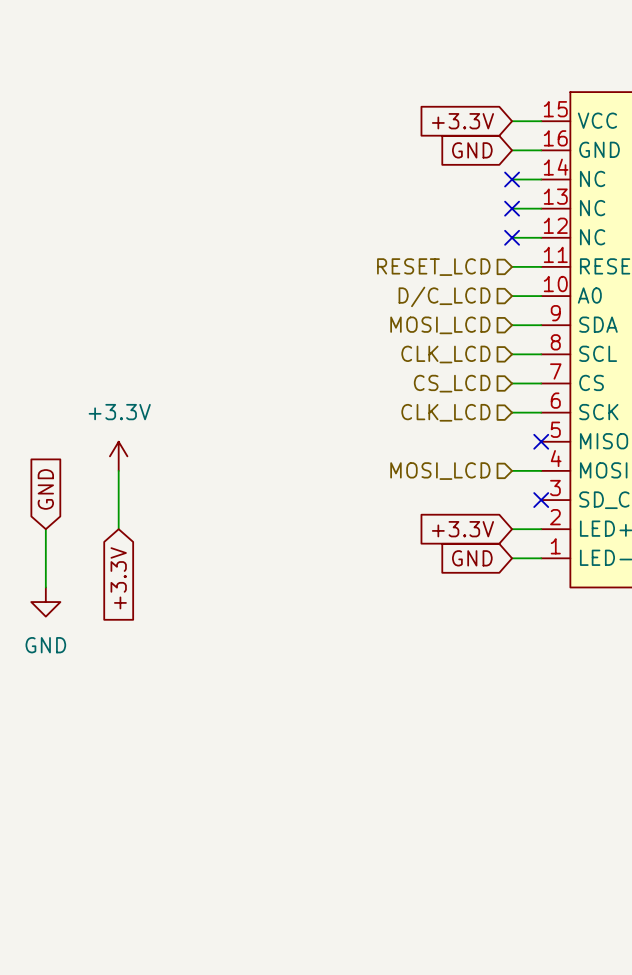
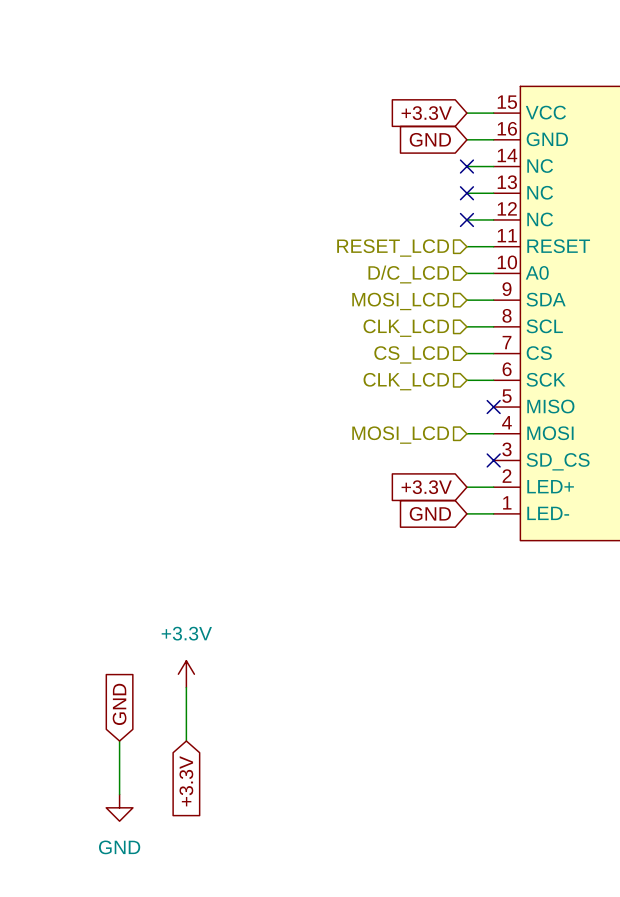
power symbol: +3.3V (118, 456) -> none
wire: (118, 470) (118, 529) -> none
global label: GND (45, 489) -> none
wire: (45, 529) (45, 587) -> (186, 687) (186, 741)
global label: +3.3V (118, 578) -> none
power symbol: GND (45, 602) -> none
power symbol: none -> +3.3V (186, 674)
global label: none -> GND (119, 704)
wire: none -> (119, 741) (119, 794)
global label: none -> +3.3V (186, 781)
power symbol: none -> GND (119, 807)

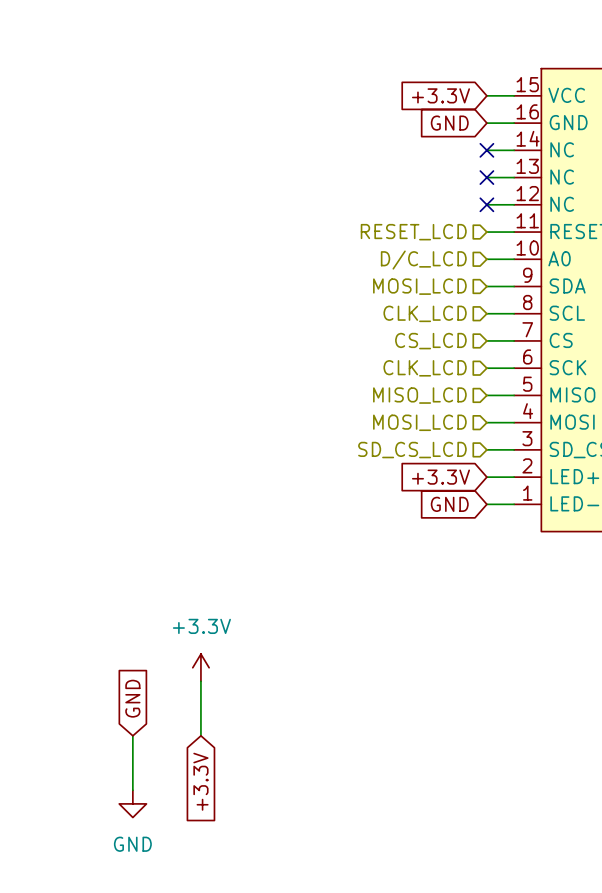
wire: none -> (486, 395) (514, 395)
no-connect mark: (493, 407) -> none
hierarchical label: none -> MISO_LCD (419, 395)
wire: none -> (486, 449) (514, 449)
no-connect mark: (493, 460) -> none
hierarchical label: none -> SD_CS_LCD (412, 450)

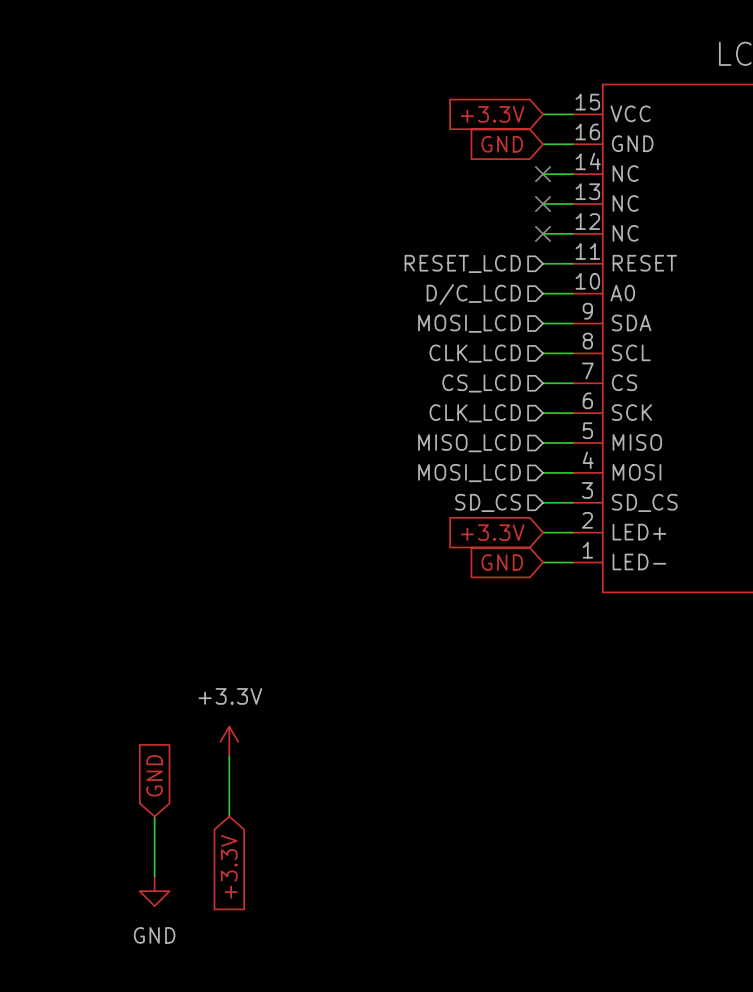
hierarchical label: SD_CS_LCD (412, 450) -> SD_CS (488, 502)

